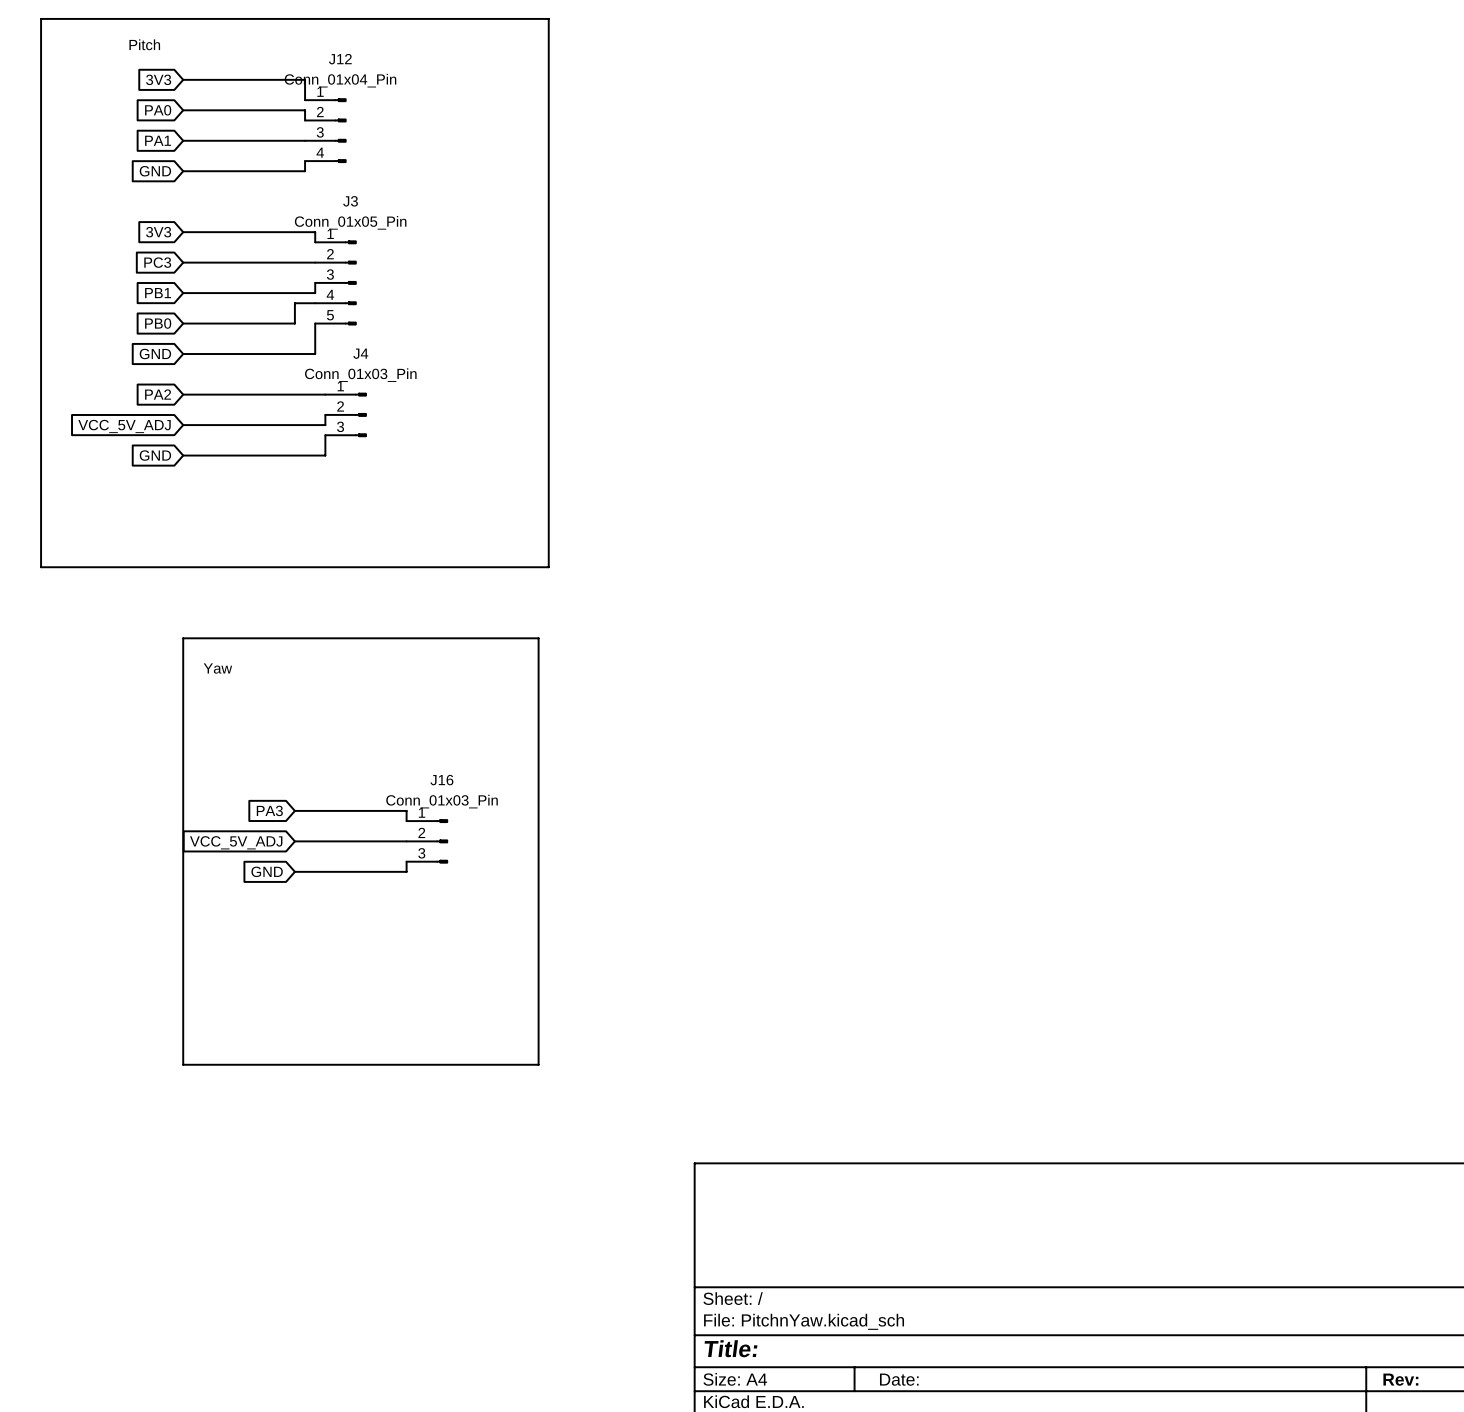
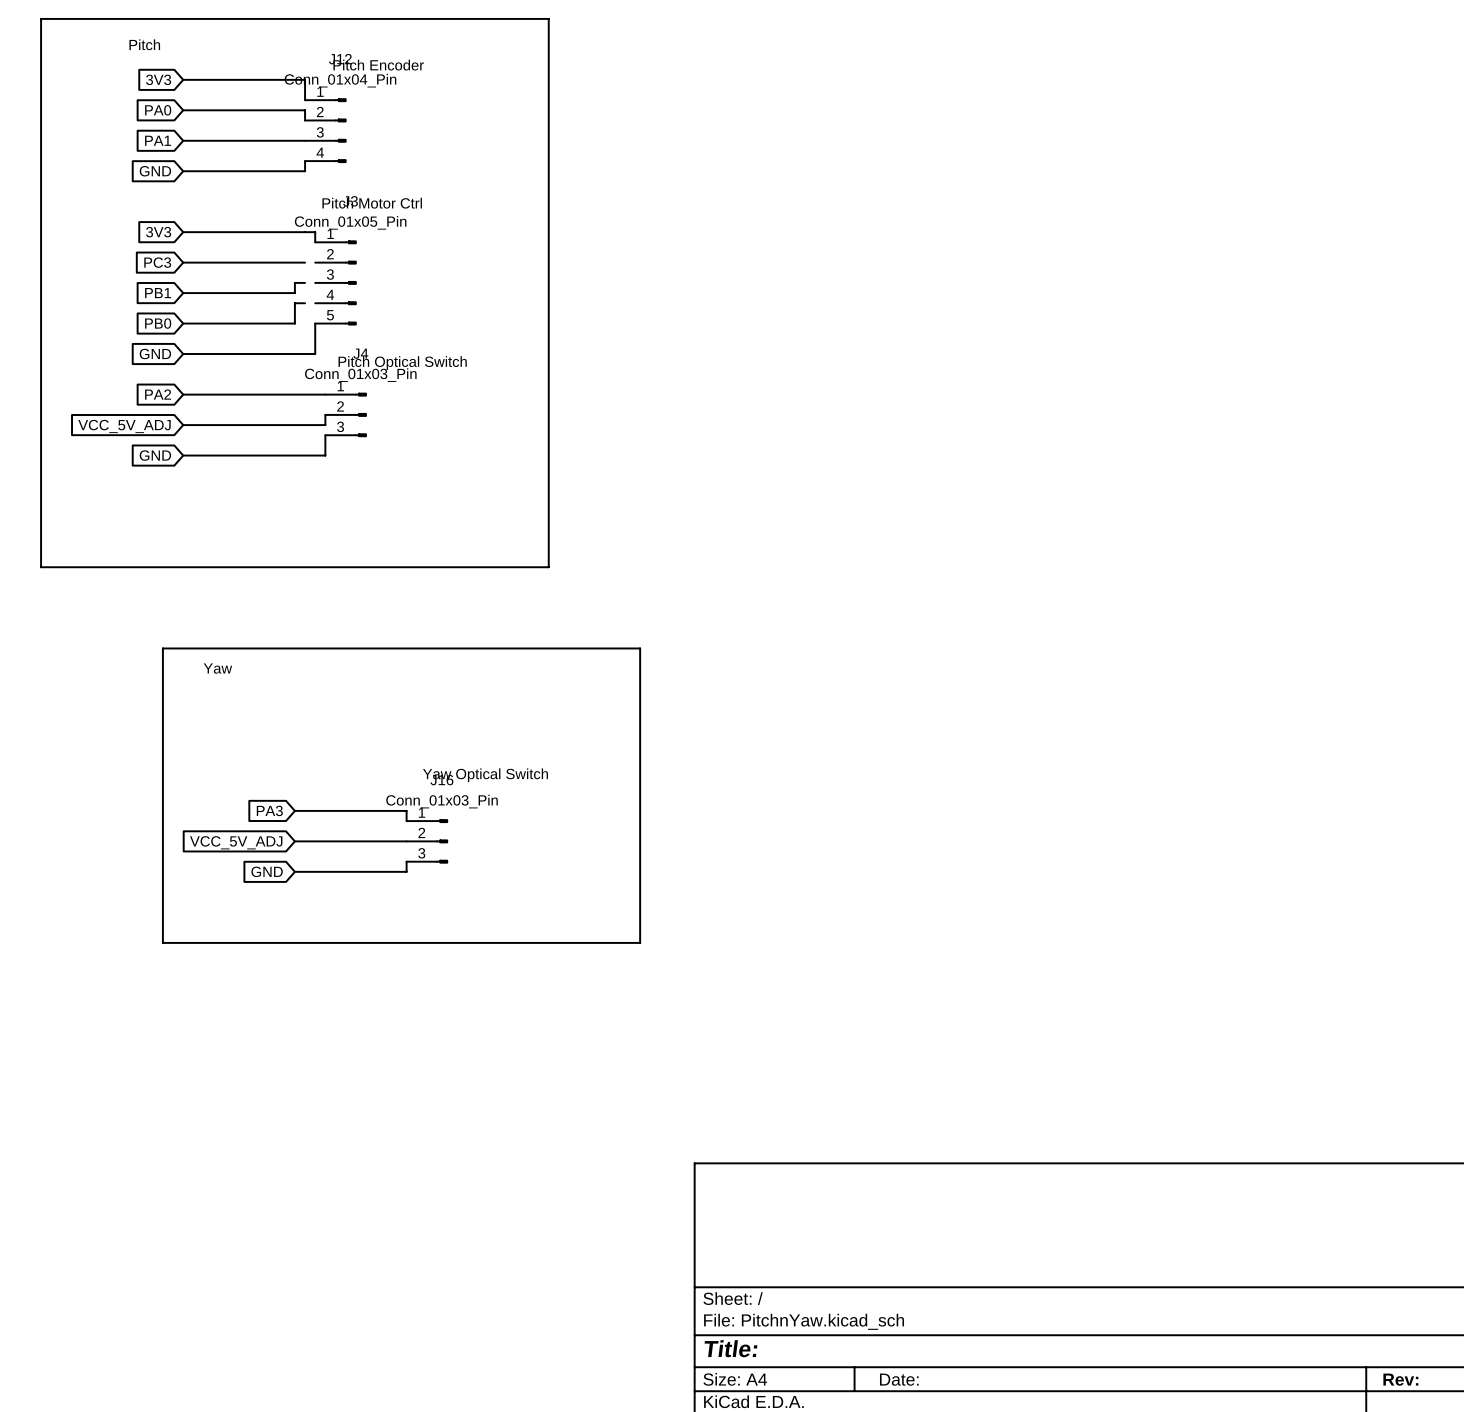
text: none -> Pitch Encoder (378, 65)
text: none -> Pitch Motor Ctrl (372, 203)
wire: (305, 262) (315, 262) -> none
wire: (315, 282) (315, 293) (294, 293) -> (305, 282) (294, 282) (294, 293)
wire: (305, 303) (315, 303) -> none
text: none -> Pitch Optical Switch (402, 363)
line: (183, 638) (538, 638) (538, 1064) (183, 1064) (183, 638) -> (162, 648) (162, 942) (640, 942) (640, 648) (162, 648)
text: none -> Yaw Optical Switch (485, 775)

